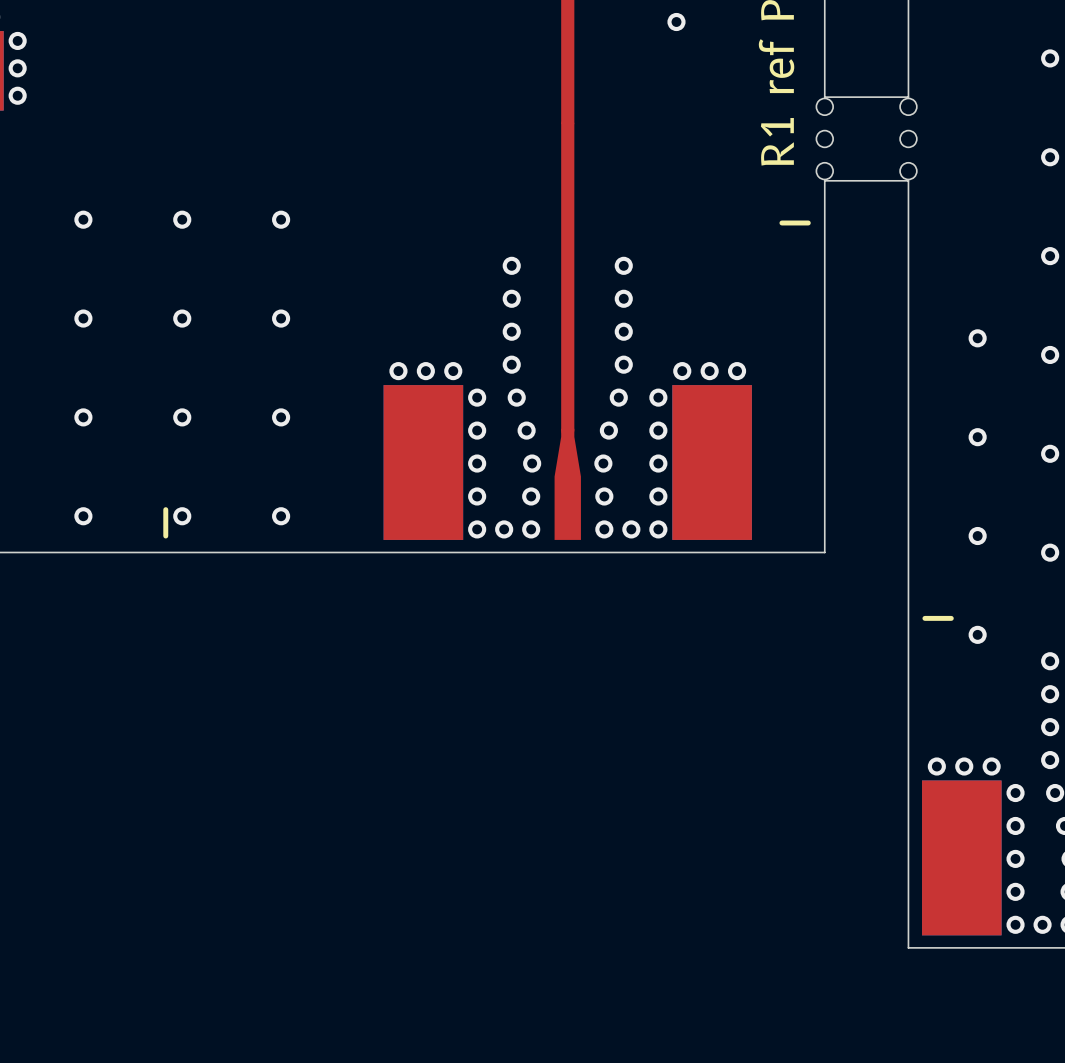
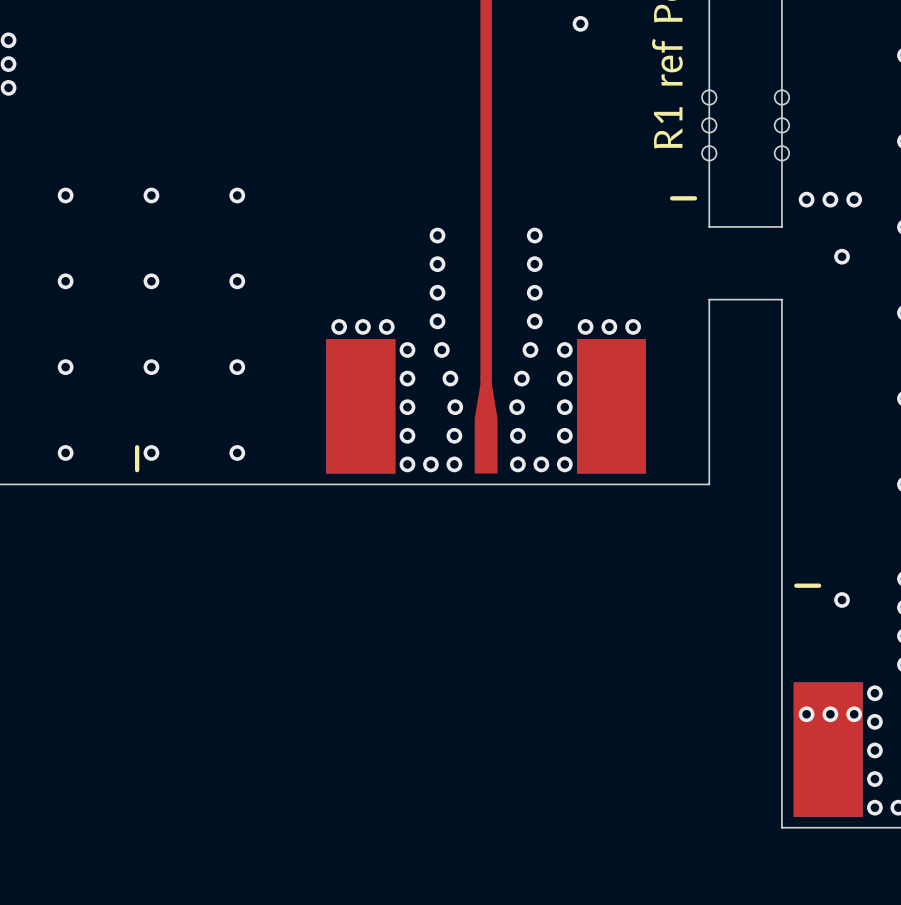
board edge: (824, 97) (908, 97) -> (709, 89) (709, 161)
board edge: (824, 180) (908, 180) -> (781, 89) (781, 161)
via: none -> (806, 199)
via: none -> (830, 199)
via: none -> (854, 199)
board edge: (824, 255) (824, 339) -> (709, 226) (781, 226)
board edge: (908, 255) (908, 339) -> (709, 299) (781, 299)
via position: (977, 338) -> (842, 256)
via: (977, 437) -> none
via: (977, 536) -> none
line: (924, 618) (951, 618) -> (796, 585) (819, 585)
via: (977, 634) -> none
via: none -> (842, 599)
via: (936, 766) -> none
via: (964, 766) -> none
via: (991, 766) -> none
via: none -> (806, 714)
via: none -> (830, 714)
via: none -> (854, 714)

